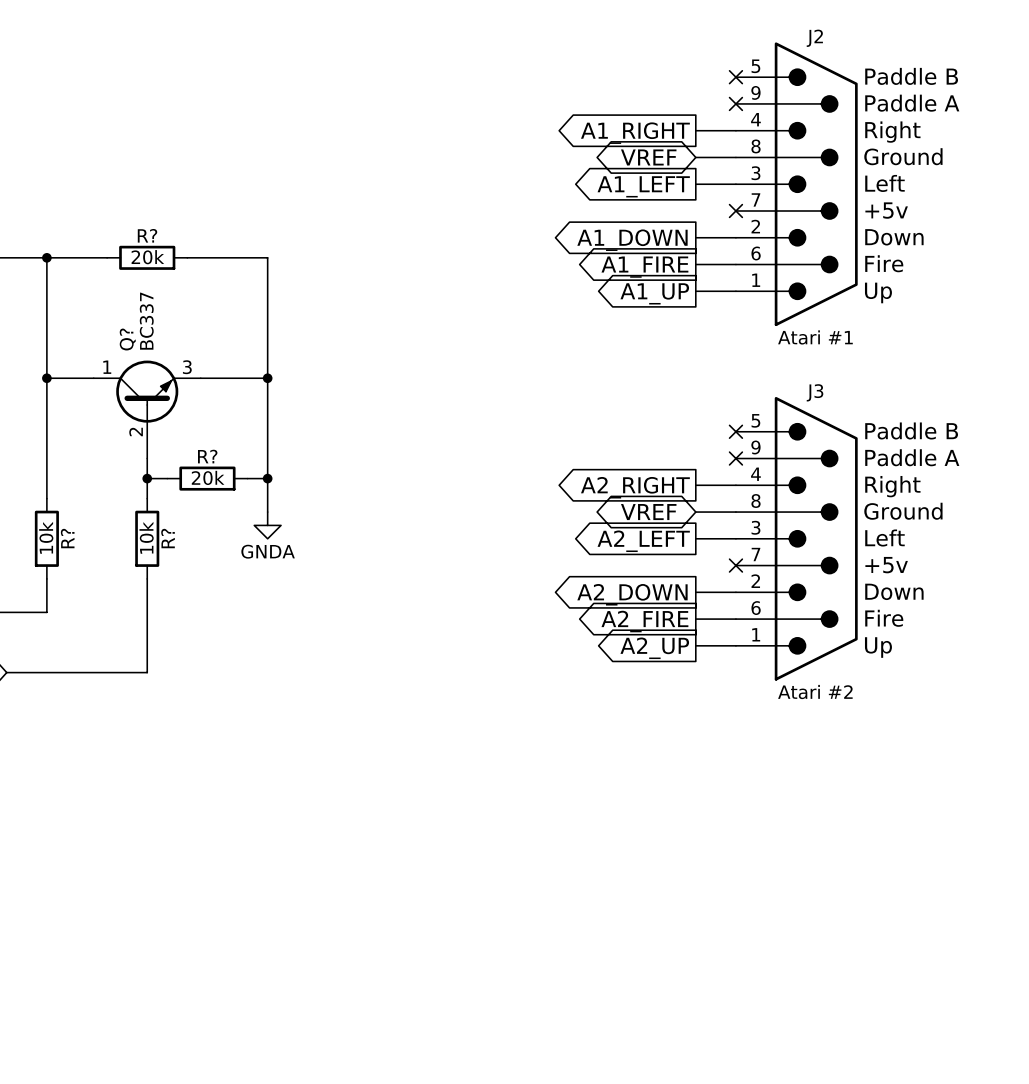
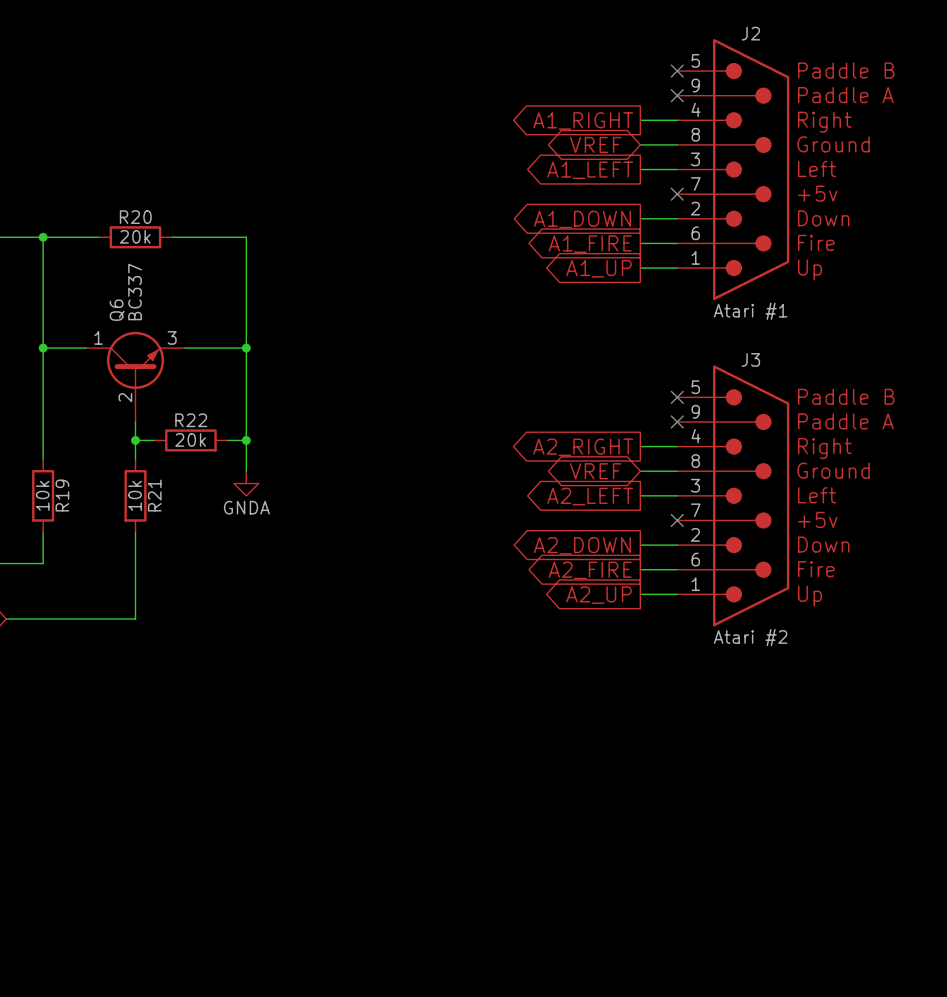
R? name: R? (147, 235) -> R20 (135, 217)
Q? name: Q? (127, 339) -> Q6 (117, 310)
R? name: R? (207, 456) -> R22 (191, 420)
R? name: R? (67, 538) -> R19 (62, 495)
R? name: R? (168, 538) -> R21 (154, 495)

